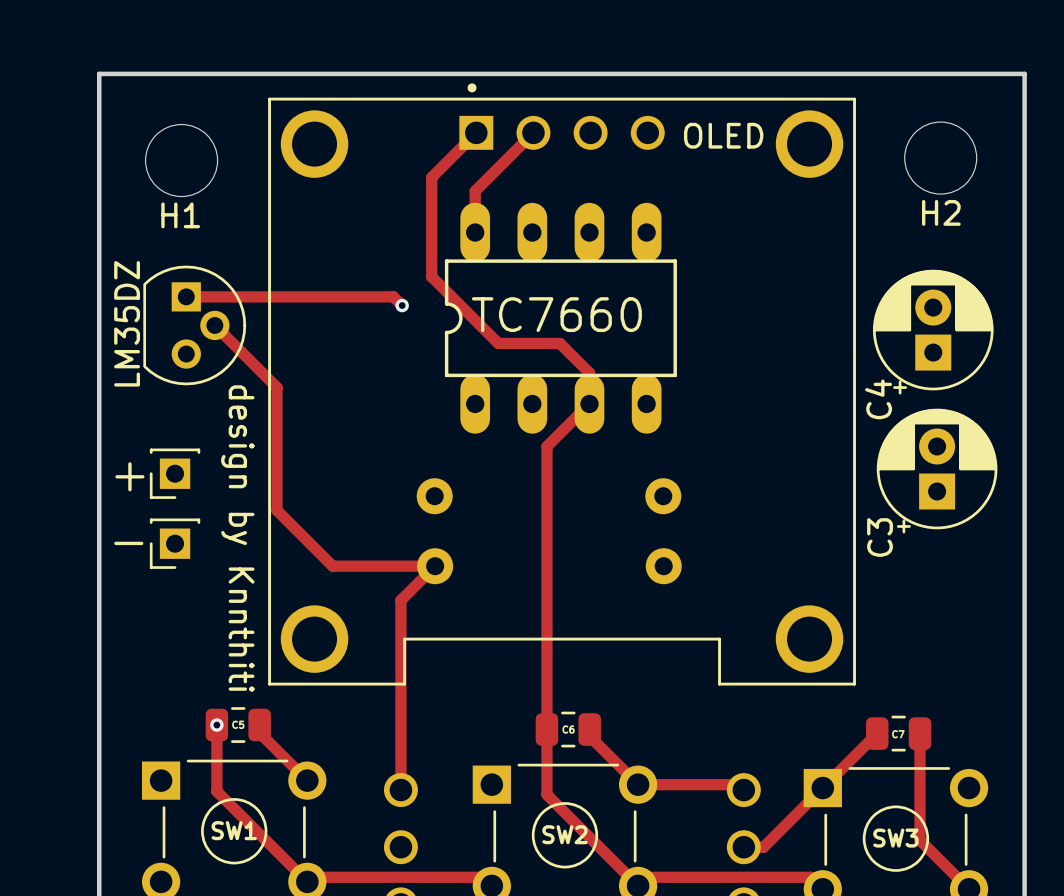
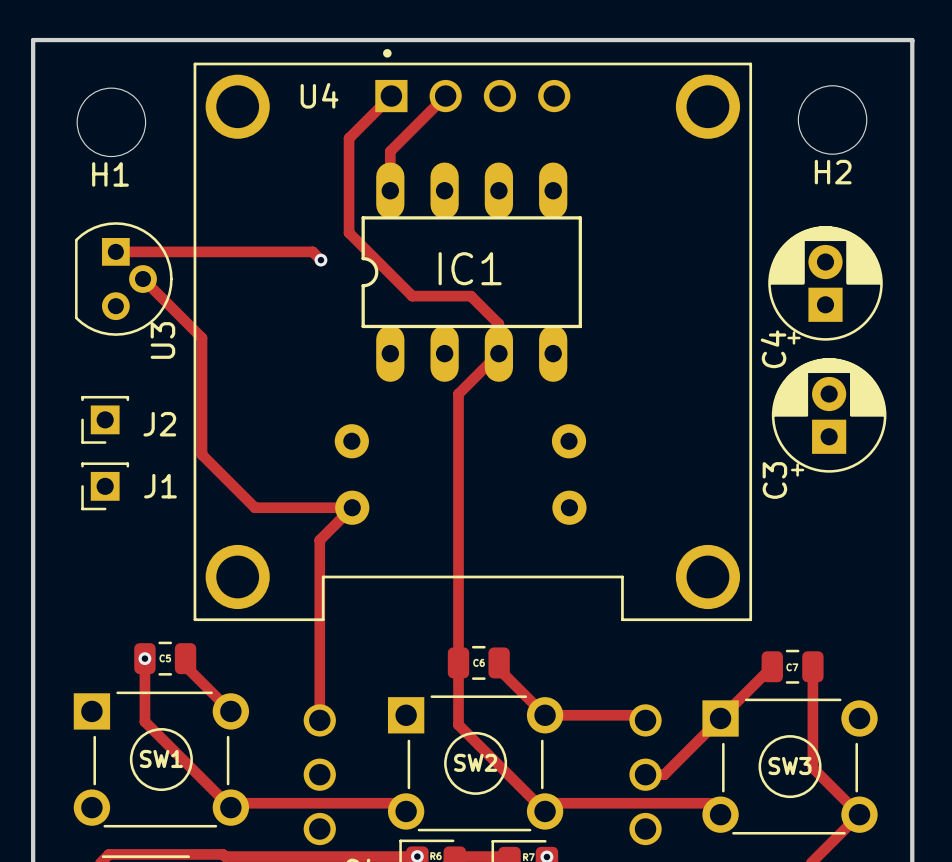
OLED name: OLED (723, 135) -> U4 (319, 95)
TC7660 name: TC7660 (556, 314) -> IC1 (470, 268)
LM35DZ name: LM35DZ (127, 323) -> U3 (162, 340)
J2 name: + (129, 476) -> J2 (159, 424)
text: design by Knnthiti (237, 538) -> none
J1 name: - (128, 543) -> J1 (160, 486)

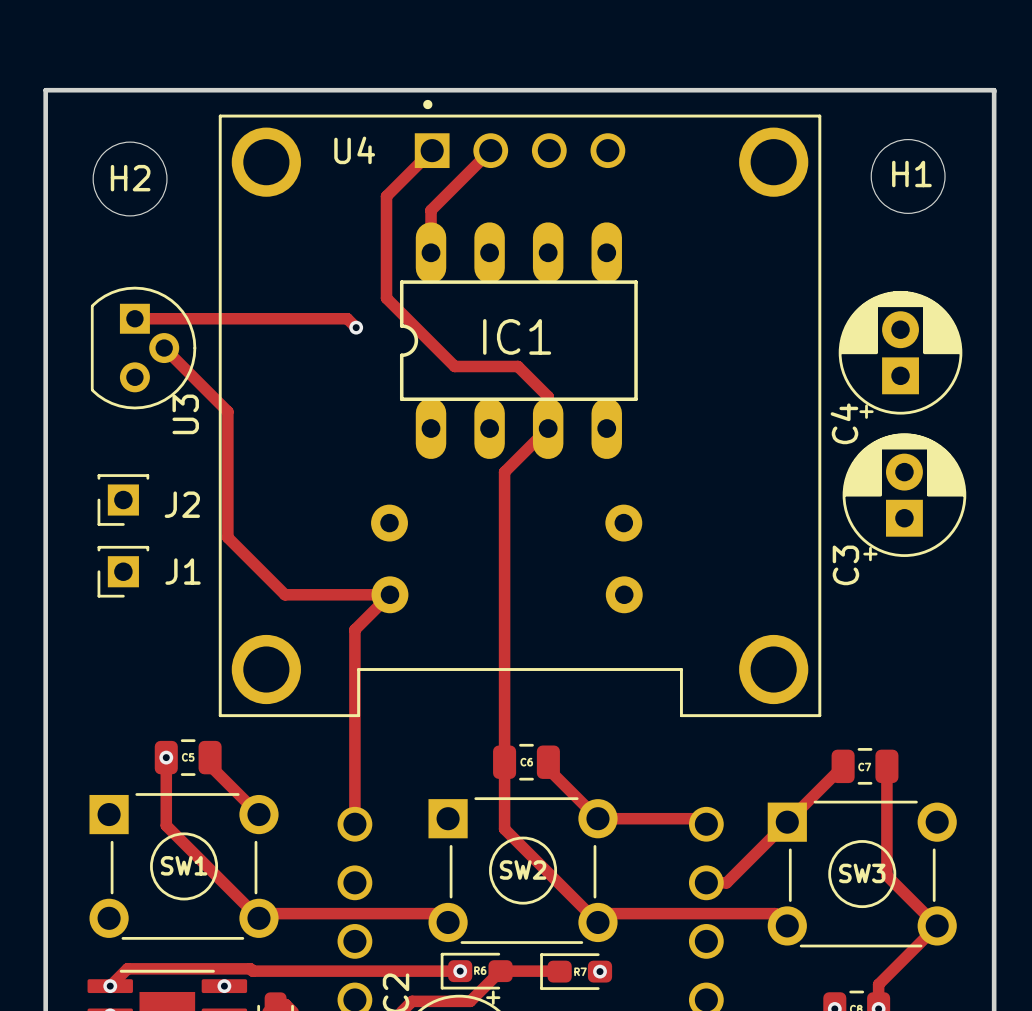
H2 name: H2 (833, 172) -> H1 (911, 173)
H1 name: H1 (110, 174) -> H2 (130, 178)

